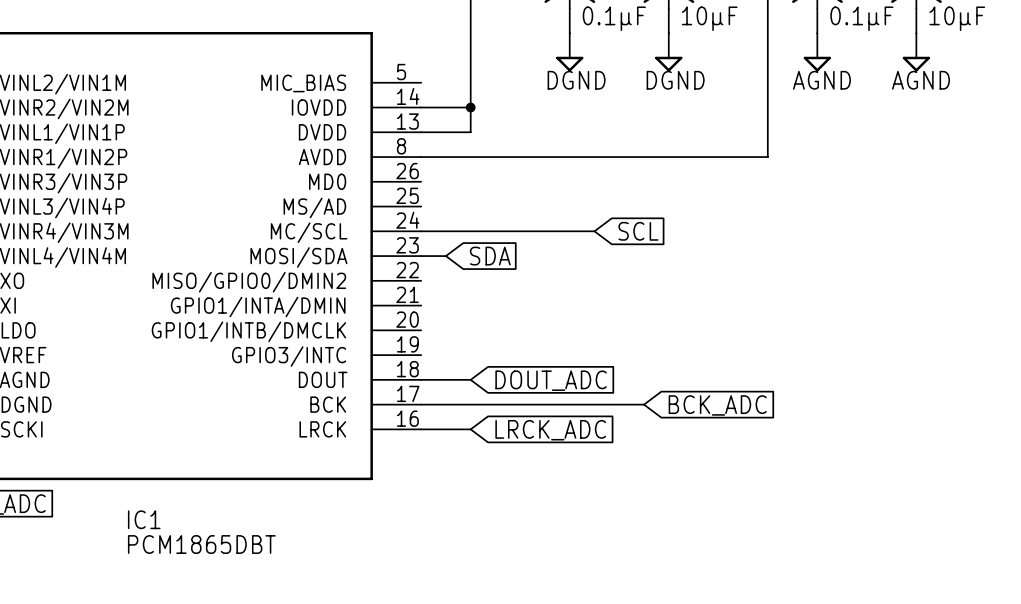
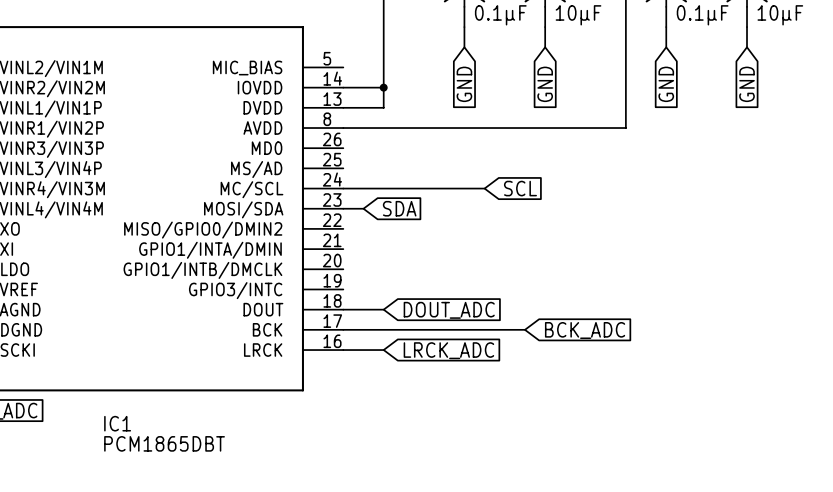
power symbol: DGND (569, 52) -> none
power symbol: DGND (668, 52) -> none
power symbol: AGND (817, 52) -> none
power symbol: AGND (916, 52) -> none
global label: none -> GND (464, 84)
global label: none -> GND (545, 84)
global label: none -> GND (666, 84)
global label: none -> GND (747, 84)

